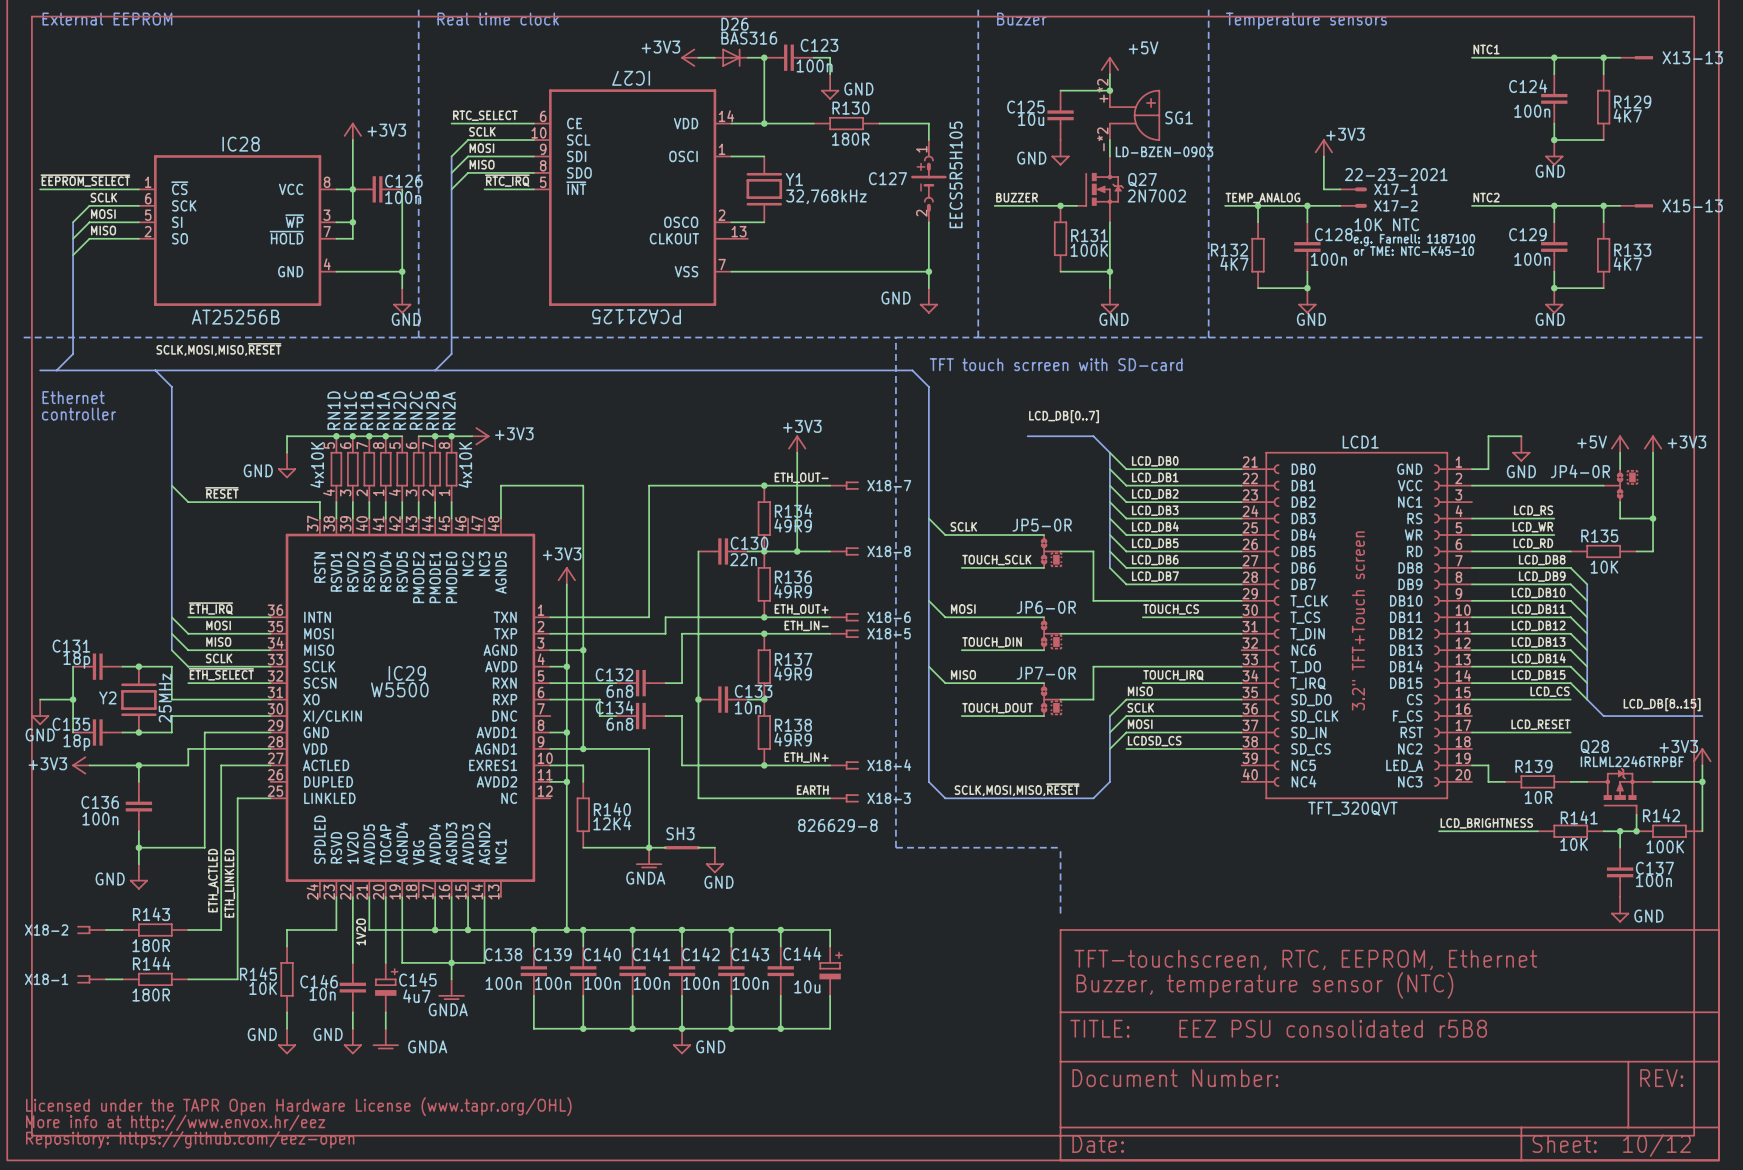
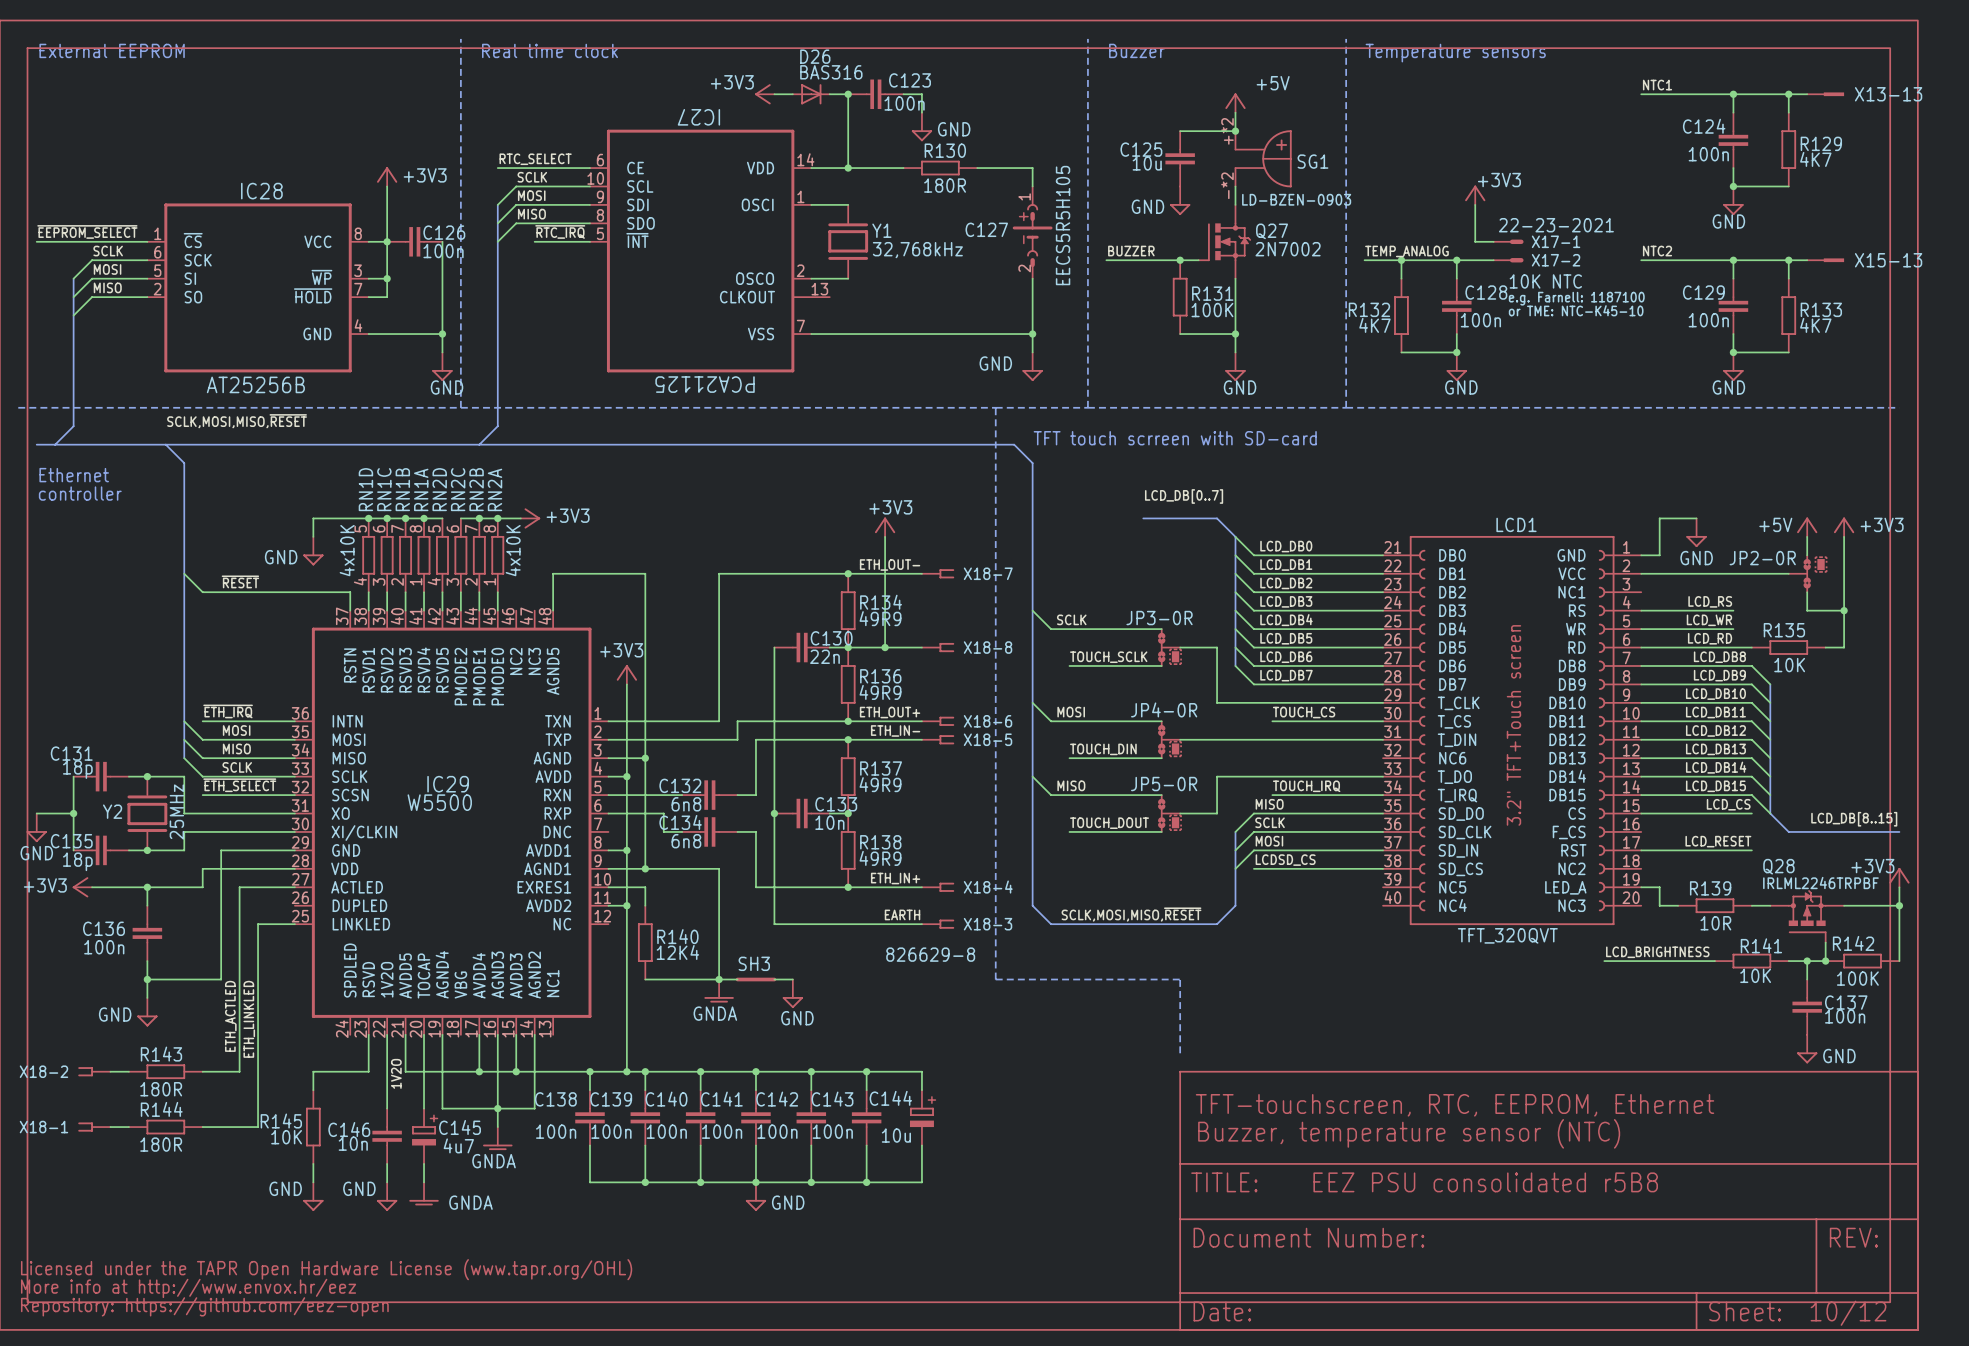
JP4-0R name: JP4-0R (1580, 471) -> JP2-0R (1762, 558)
JP5-0R name: JP5-0R (1042, 525) -> JP3-0R (1159, 618)
JP6-0R name: JP6-0R (1046, 607) -> JP4-0R (1164, 709)
JP7-0R name: JP7-0R (1046, 673) -> JP5-0R (1164, 784)

